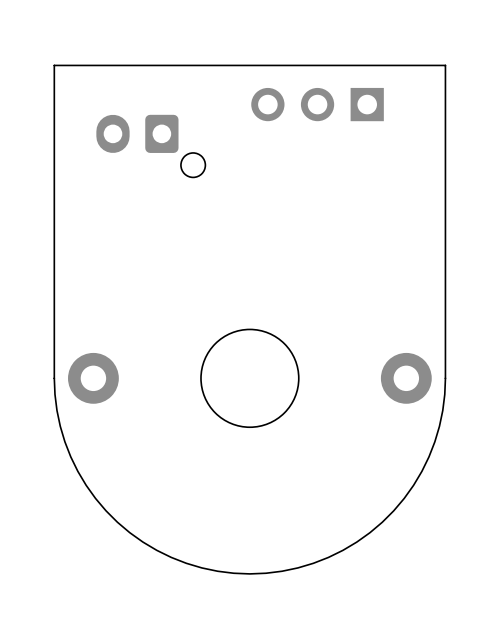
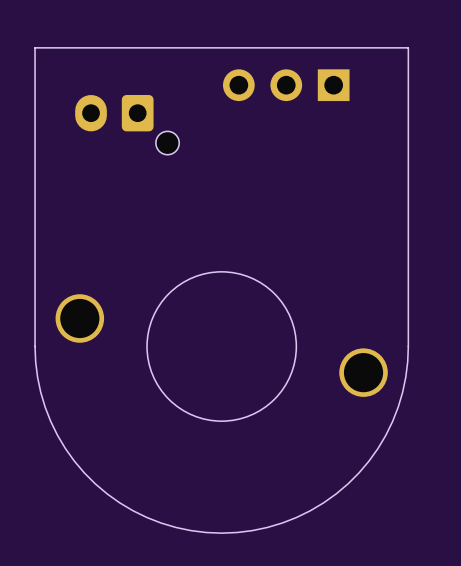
round board edge size: [200, 328, 300, 428] -> [146, 271, 297, 422]
part: none -> (79, 318)
part: (93, 378) -> none
part: (406, 378) -> none
part: none -> (363, 372)

